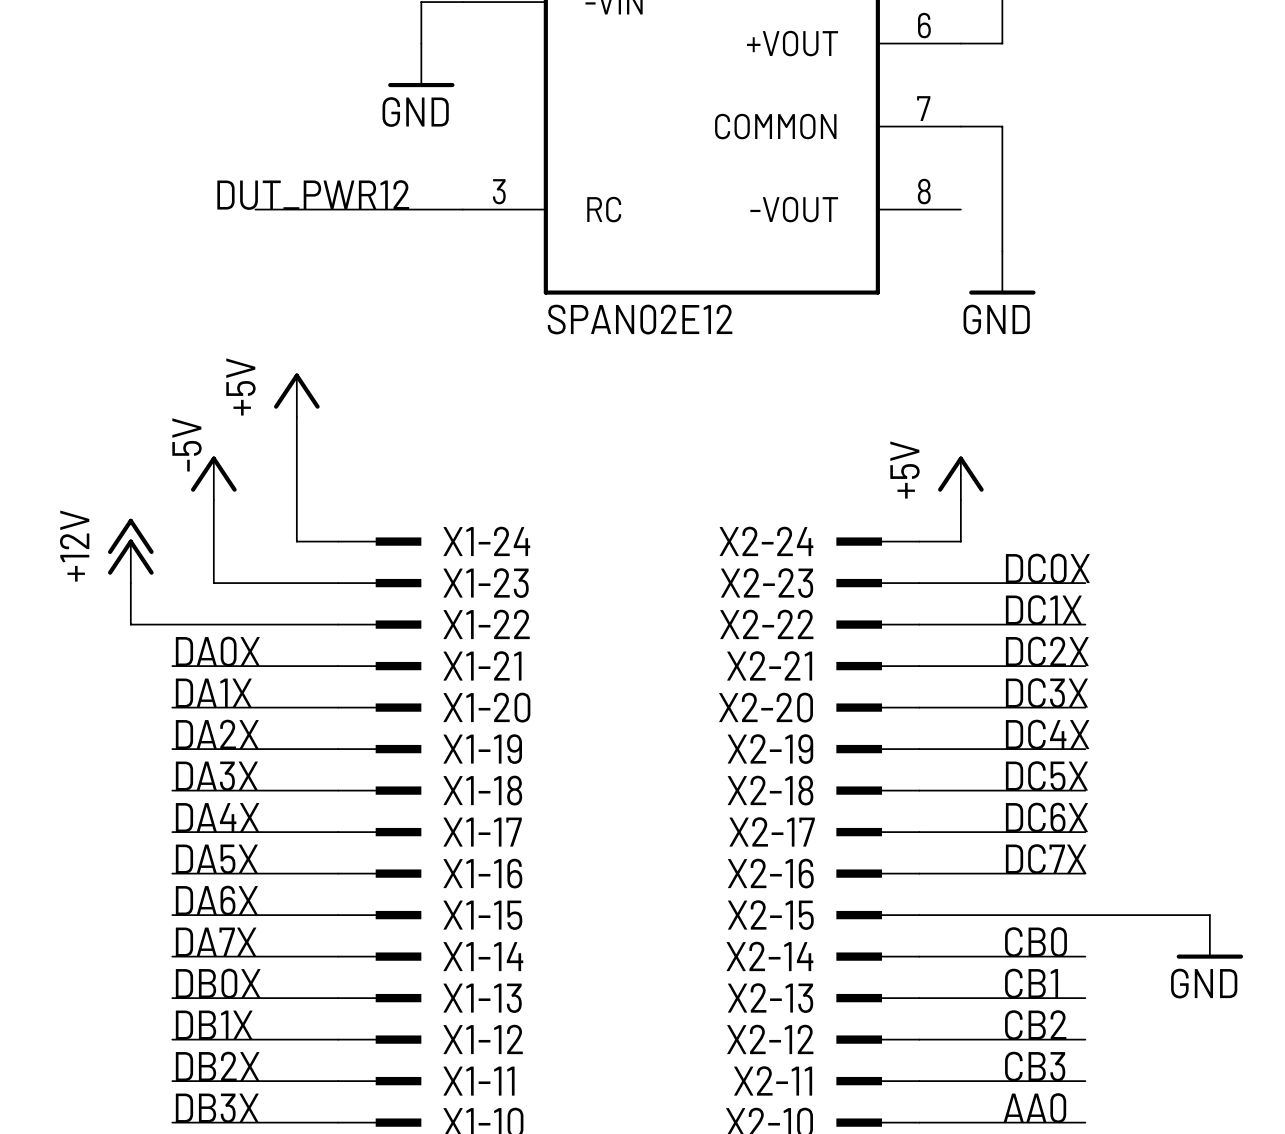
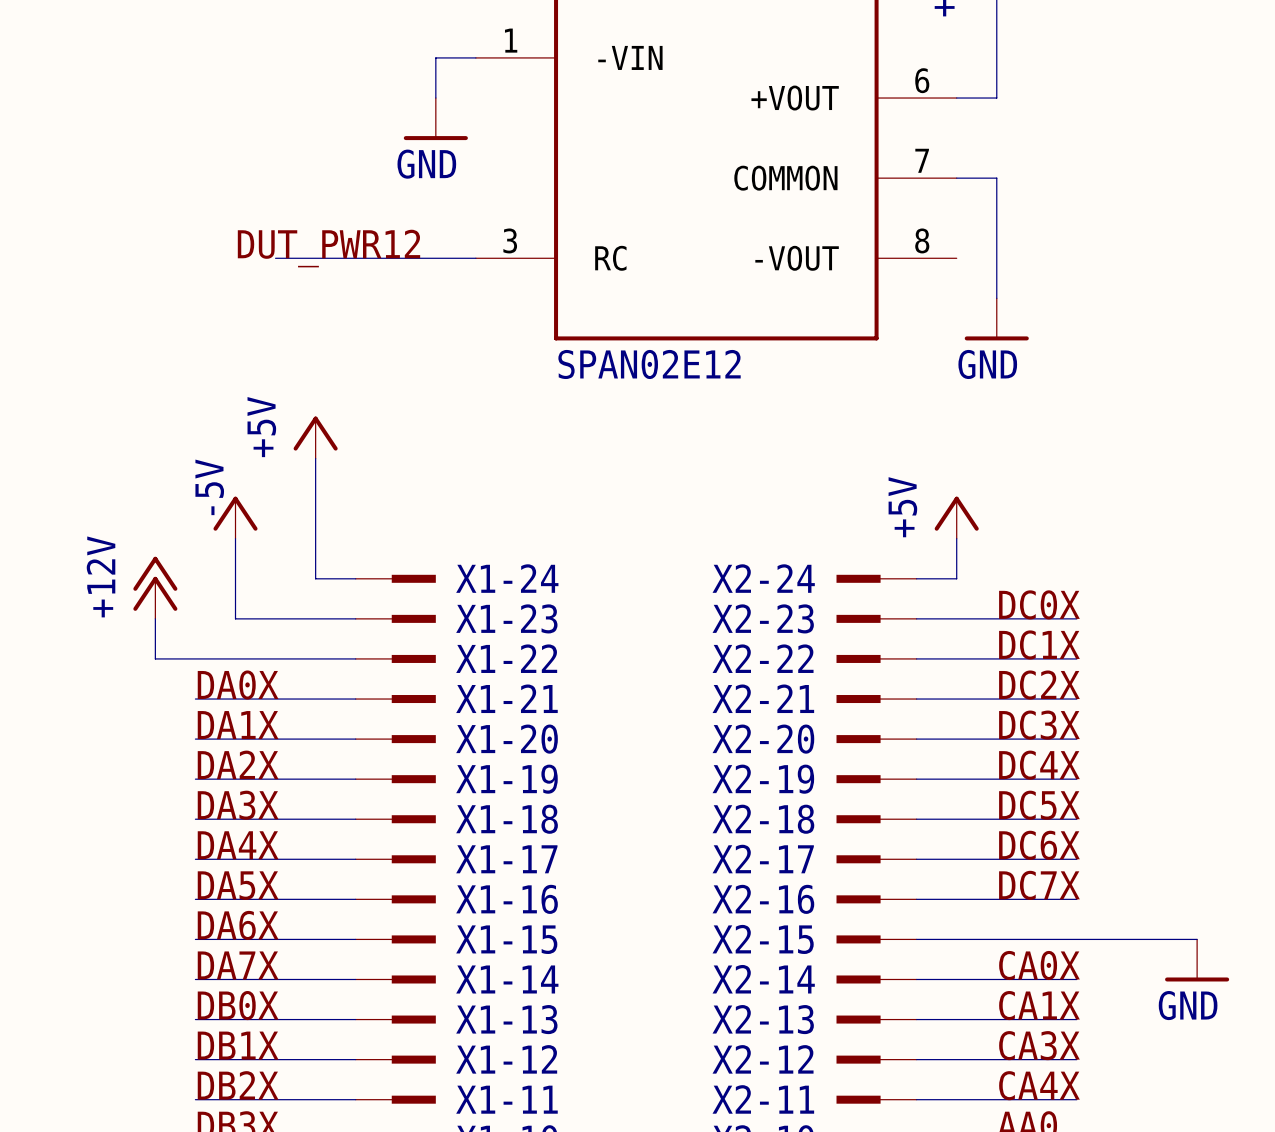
label: CB0 (1035, 942) -> CA0X (1039, 965)
label: CB1 (1031, 983) -> CA1X (1039, 1005)
label: CB2 (1035, 1025) -> CA3X (1039, 1045)
label: CB3 (1035, 1066) -> CA4X (1039, 1085)

